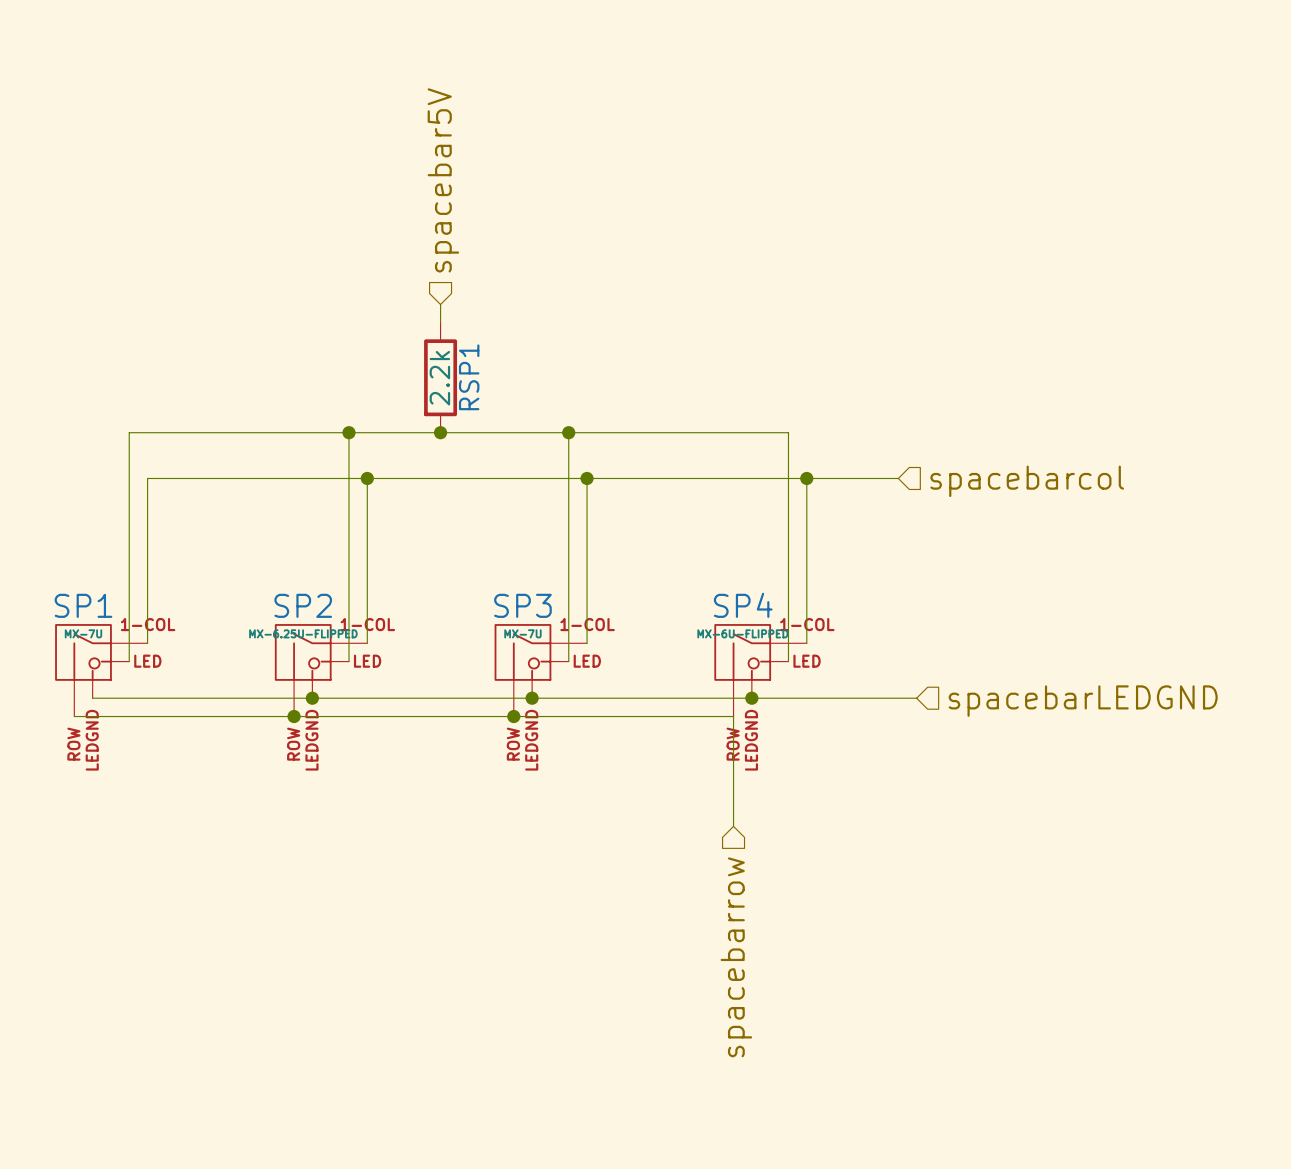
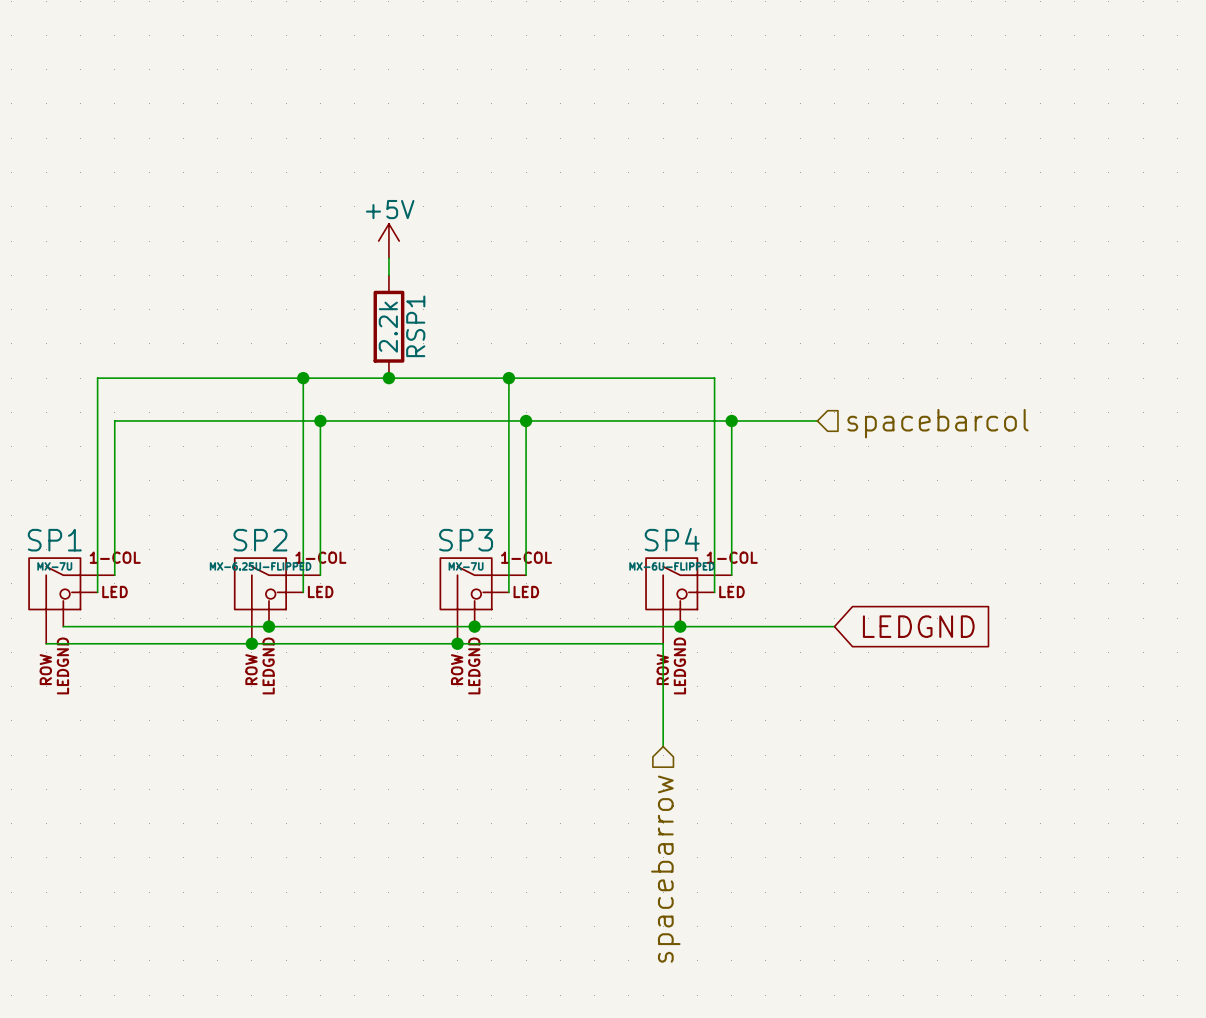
hierarchical label: spacebar5V (443, 180) -> none
power symbol: none -> +5V (388, 241)
global label: none -> LEDGND (918, 626)
hierarchical label: spacebarLEDGND (1083, 701) -> none

